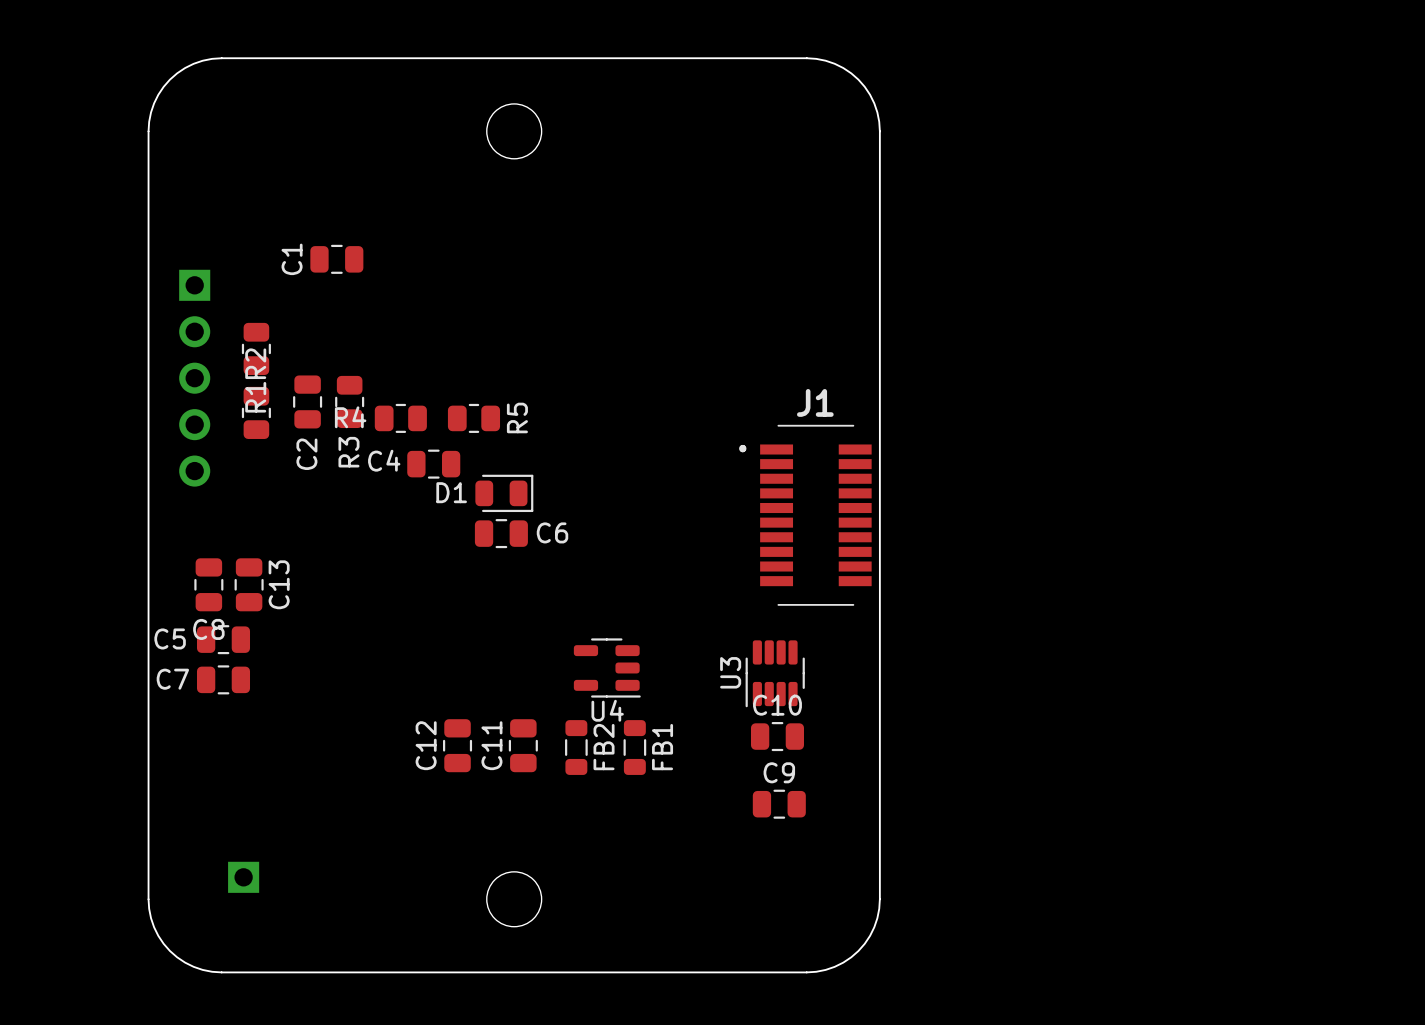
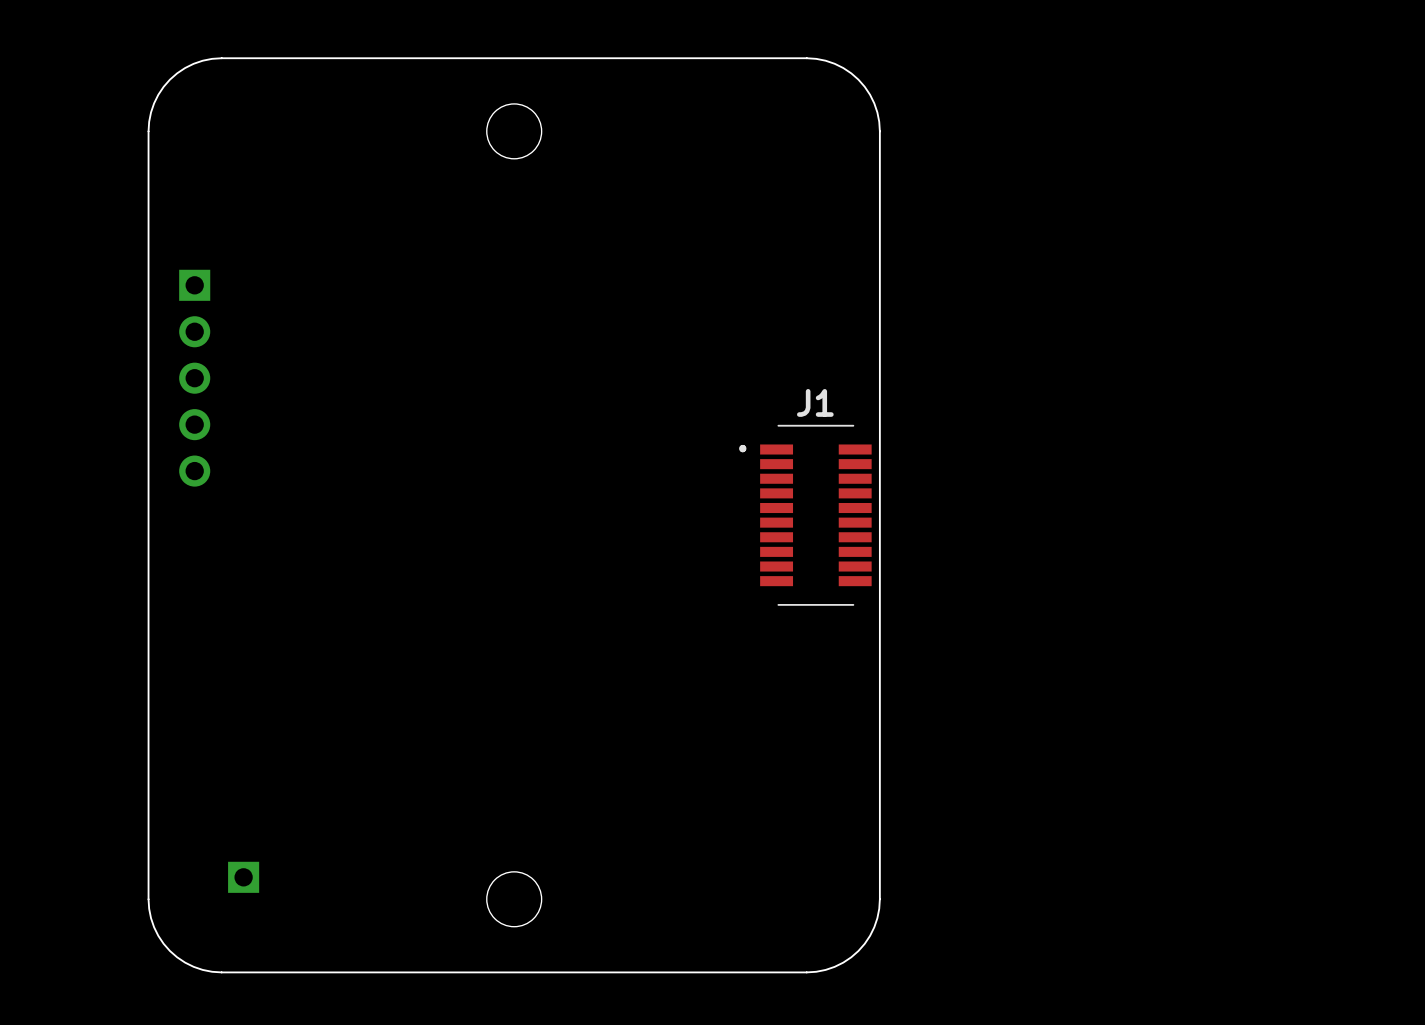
C1: (336, 259) -> none
R1: (256, 348) -> none
C2: (307, 401) -> none
R3: (349, 401) -> none
R2: (256, 412) -> none
R4: (400, 418) -> none
R5: (473, 418) -> none
C4: (433, 464) -> none
D1: (504, 493) -> none
C6: (501, 533) -> none
C8: (208, 584) -> none
C13: (249, 584) -> none
C5: (223, 639) -> none
U4: (607, 667) -> none
U3: (775, 673) -> none
C7: (223, 679) -> none
C10: (777, 736) -> none
C12: (457, 745) -> none
C11: (523, 745) -> none
FB2: (576, 747) -> none
FB1: (634, 747) -> none
C9: (779, 804) -> none

